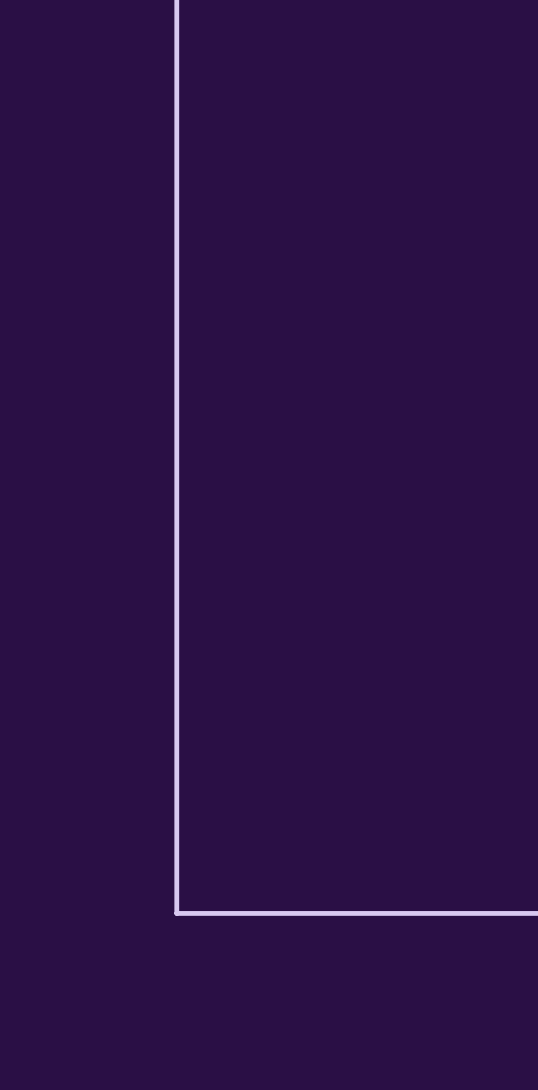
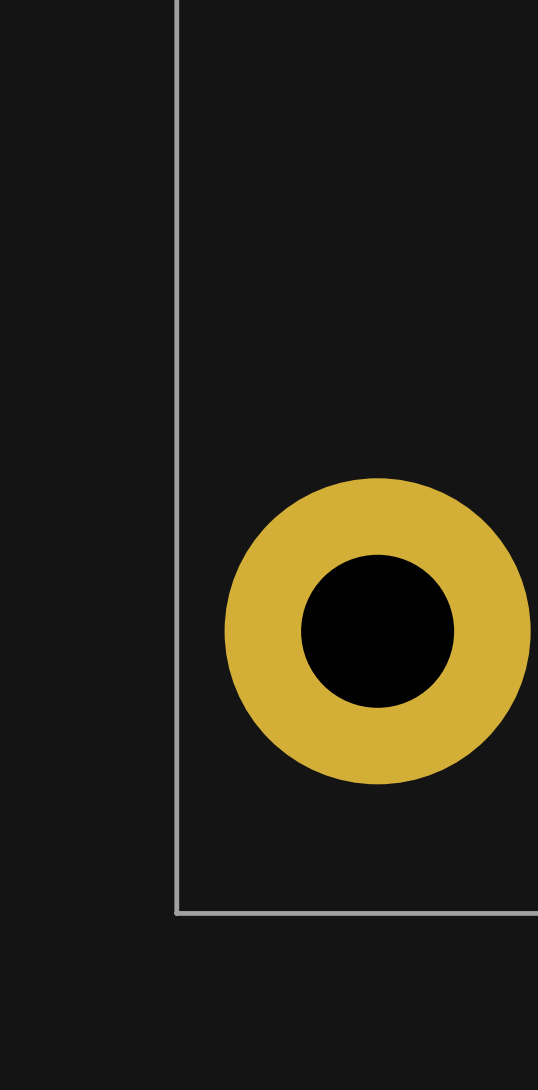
part: none -> (377, 631)

